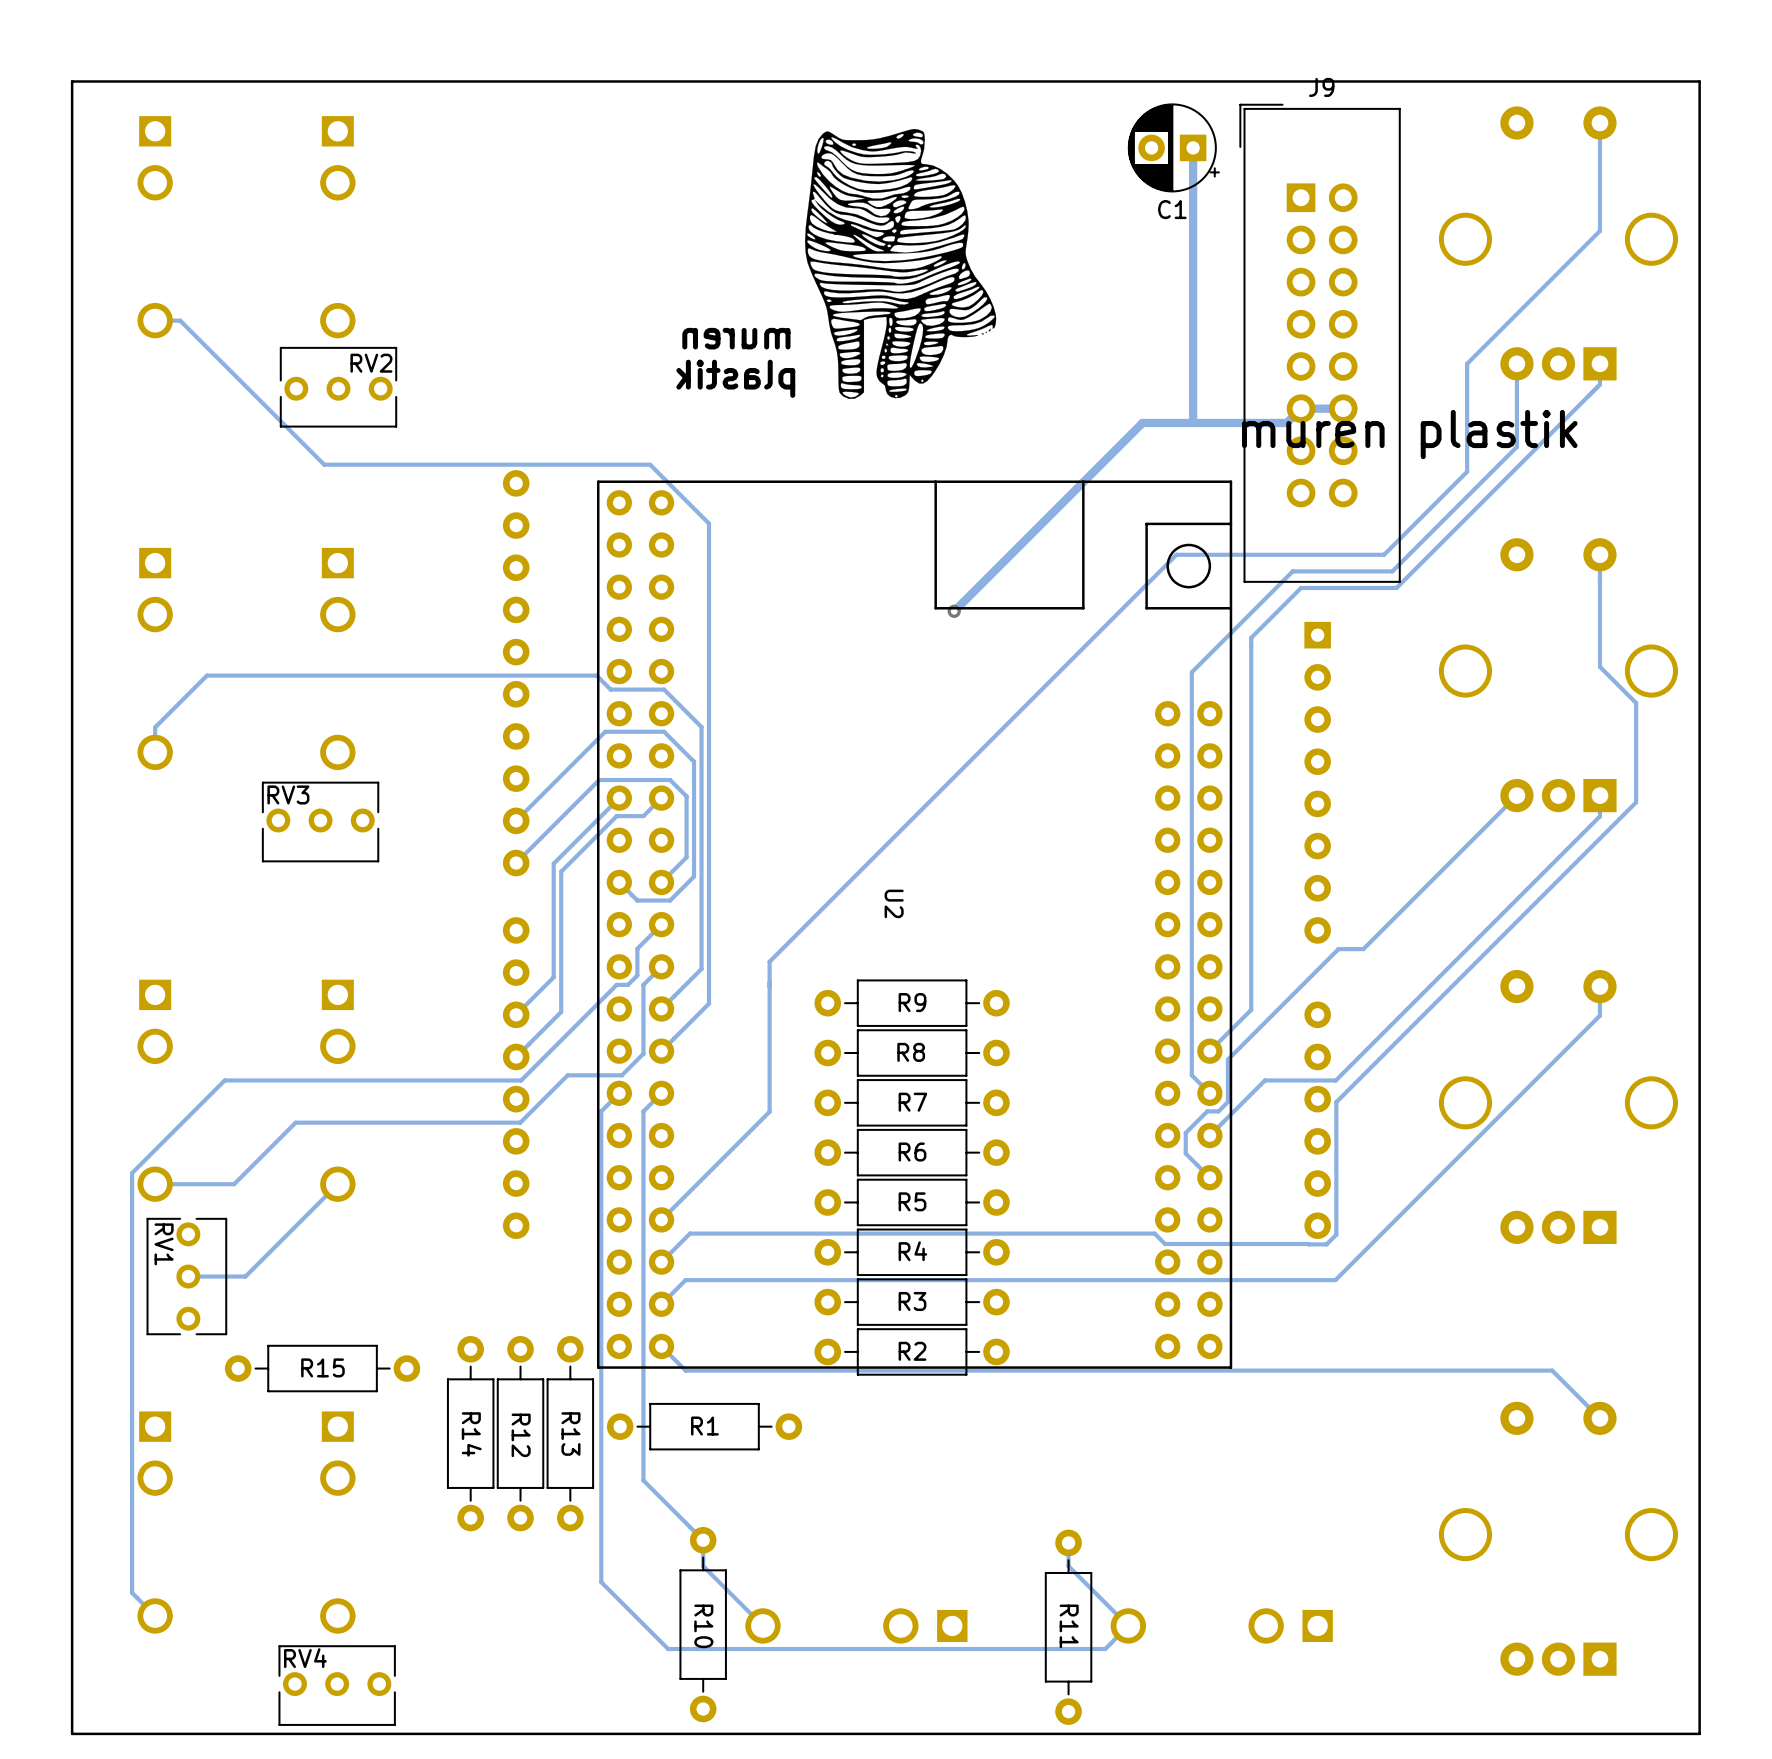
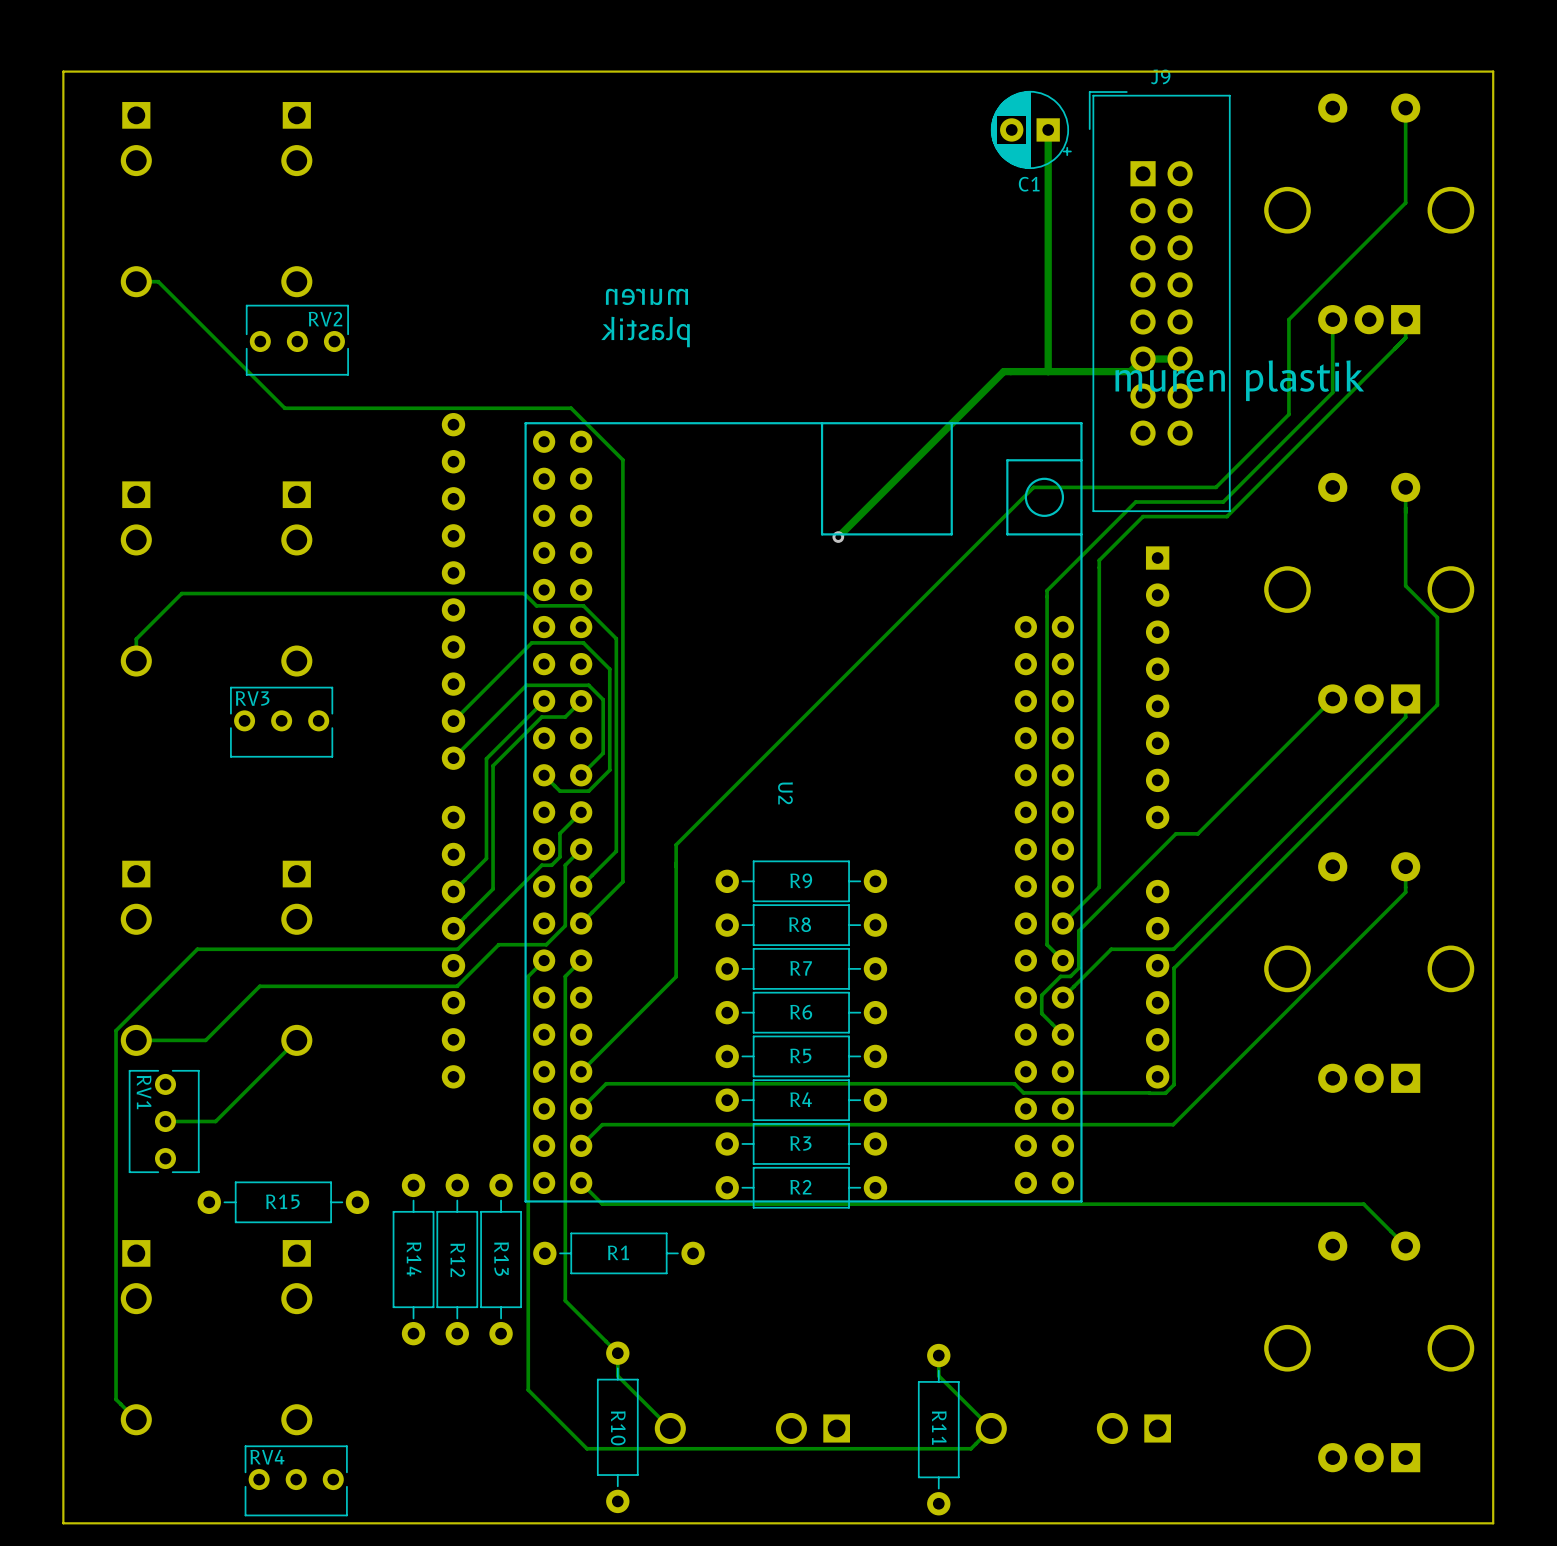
drawing: [805, 128, 997, 400] -> none

